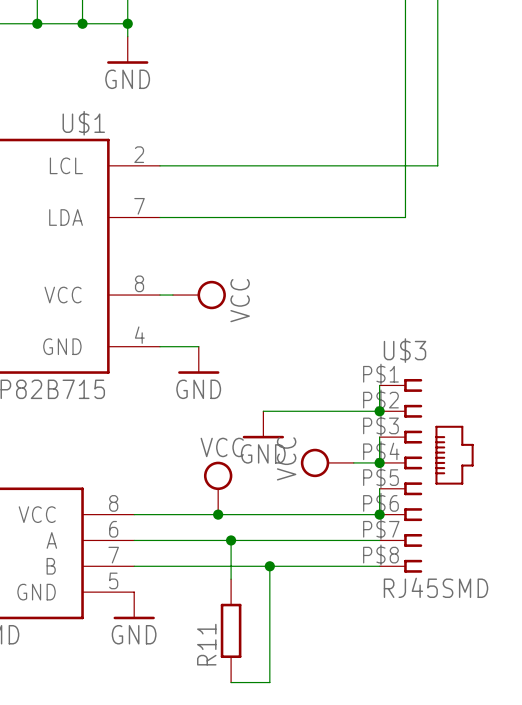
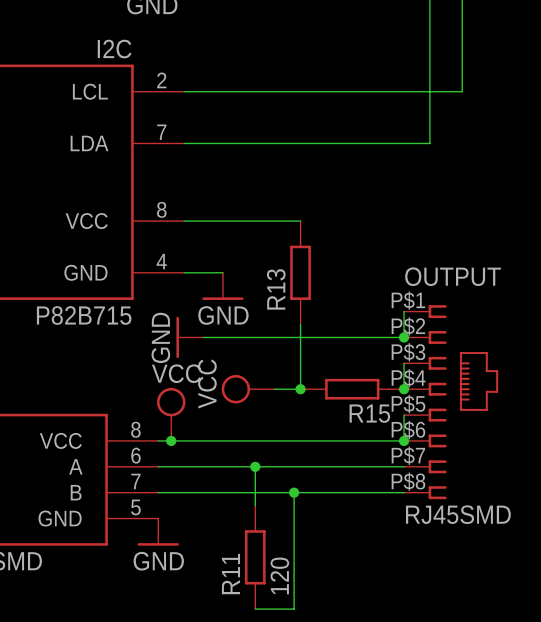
U$1 name: U$1 (83, 123) -> I2C (114, 49)
wire: none -> (197, 221) (300, 221)
power symbol: VCC (199, 295) -> none
R13: none -> (300, 272)
U$3 name: U$3 (405, 350) -> OUTPUT (453, 276)
wire: none -> (300, 324) (300, 389) (274, 389)
wire: none -> (203, 337) (287, 337)
power symbol position: GND (263, 424) -> GND (189, 337)
power symbol rotation: 0° (263, 437) -> 90° clockwise (177, 337)
junction: none -> (300, 389)
R15: none -> (352, 389)
power symbol: VCC (327, 462) -> none
power symbol rotation: 0° (218, 475) -> 90° counterclockwise (235, 389)
power symbol: none -> VCC (171, 414)
junction: none -> (171, 440)
junction: (218, 514) -> none
R11 value: none -> 120 (279, 575)

